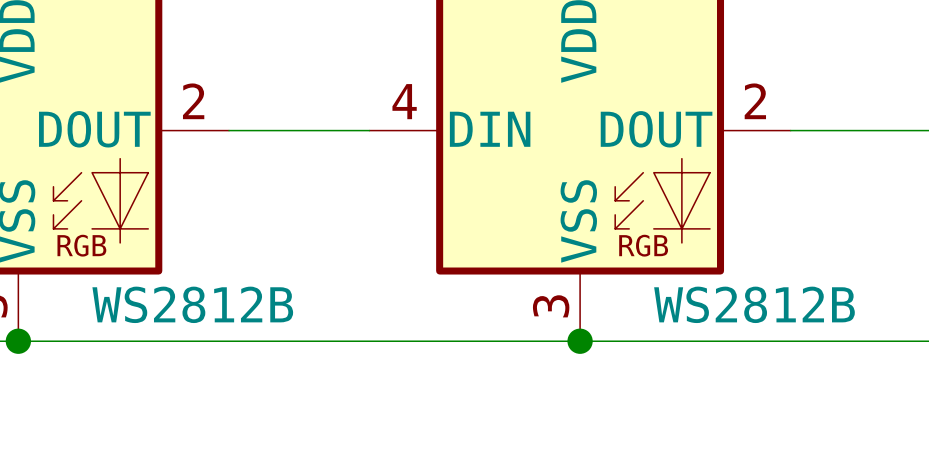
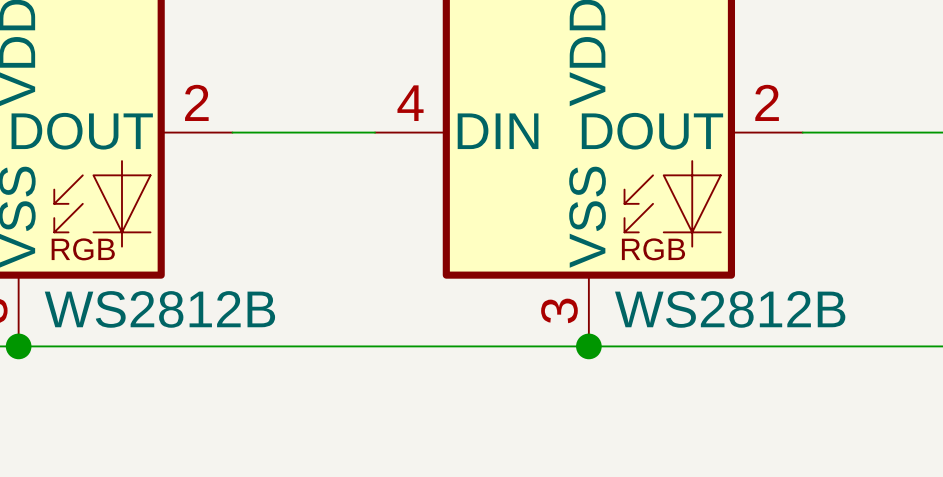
part text position: WS2812B (192, 304) -> WS2812B (159, 309)
part text position: WS2812B (754, 304) -> WS2812B (730, 309)

